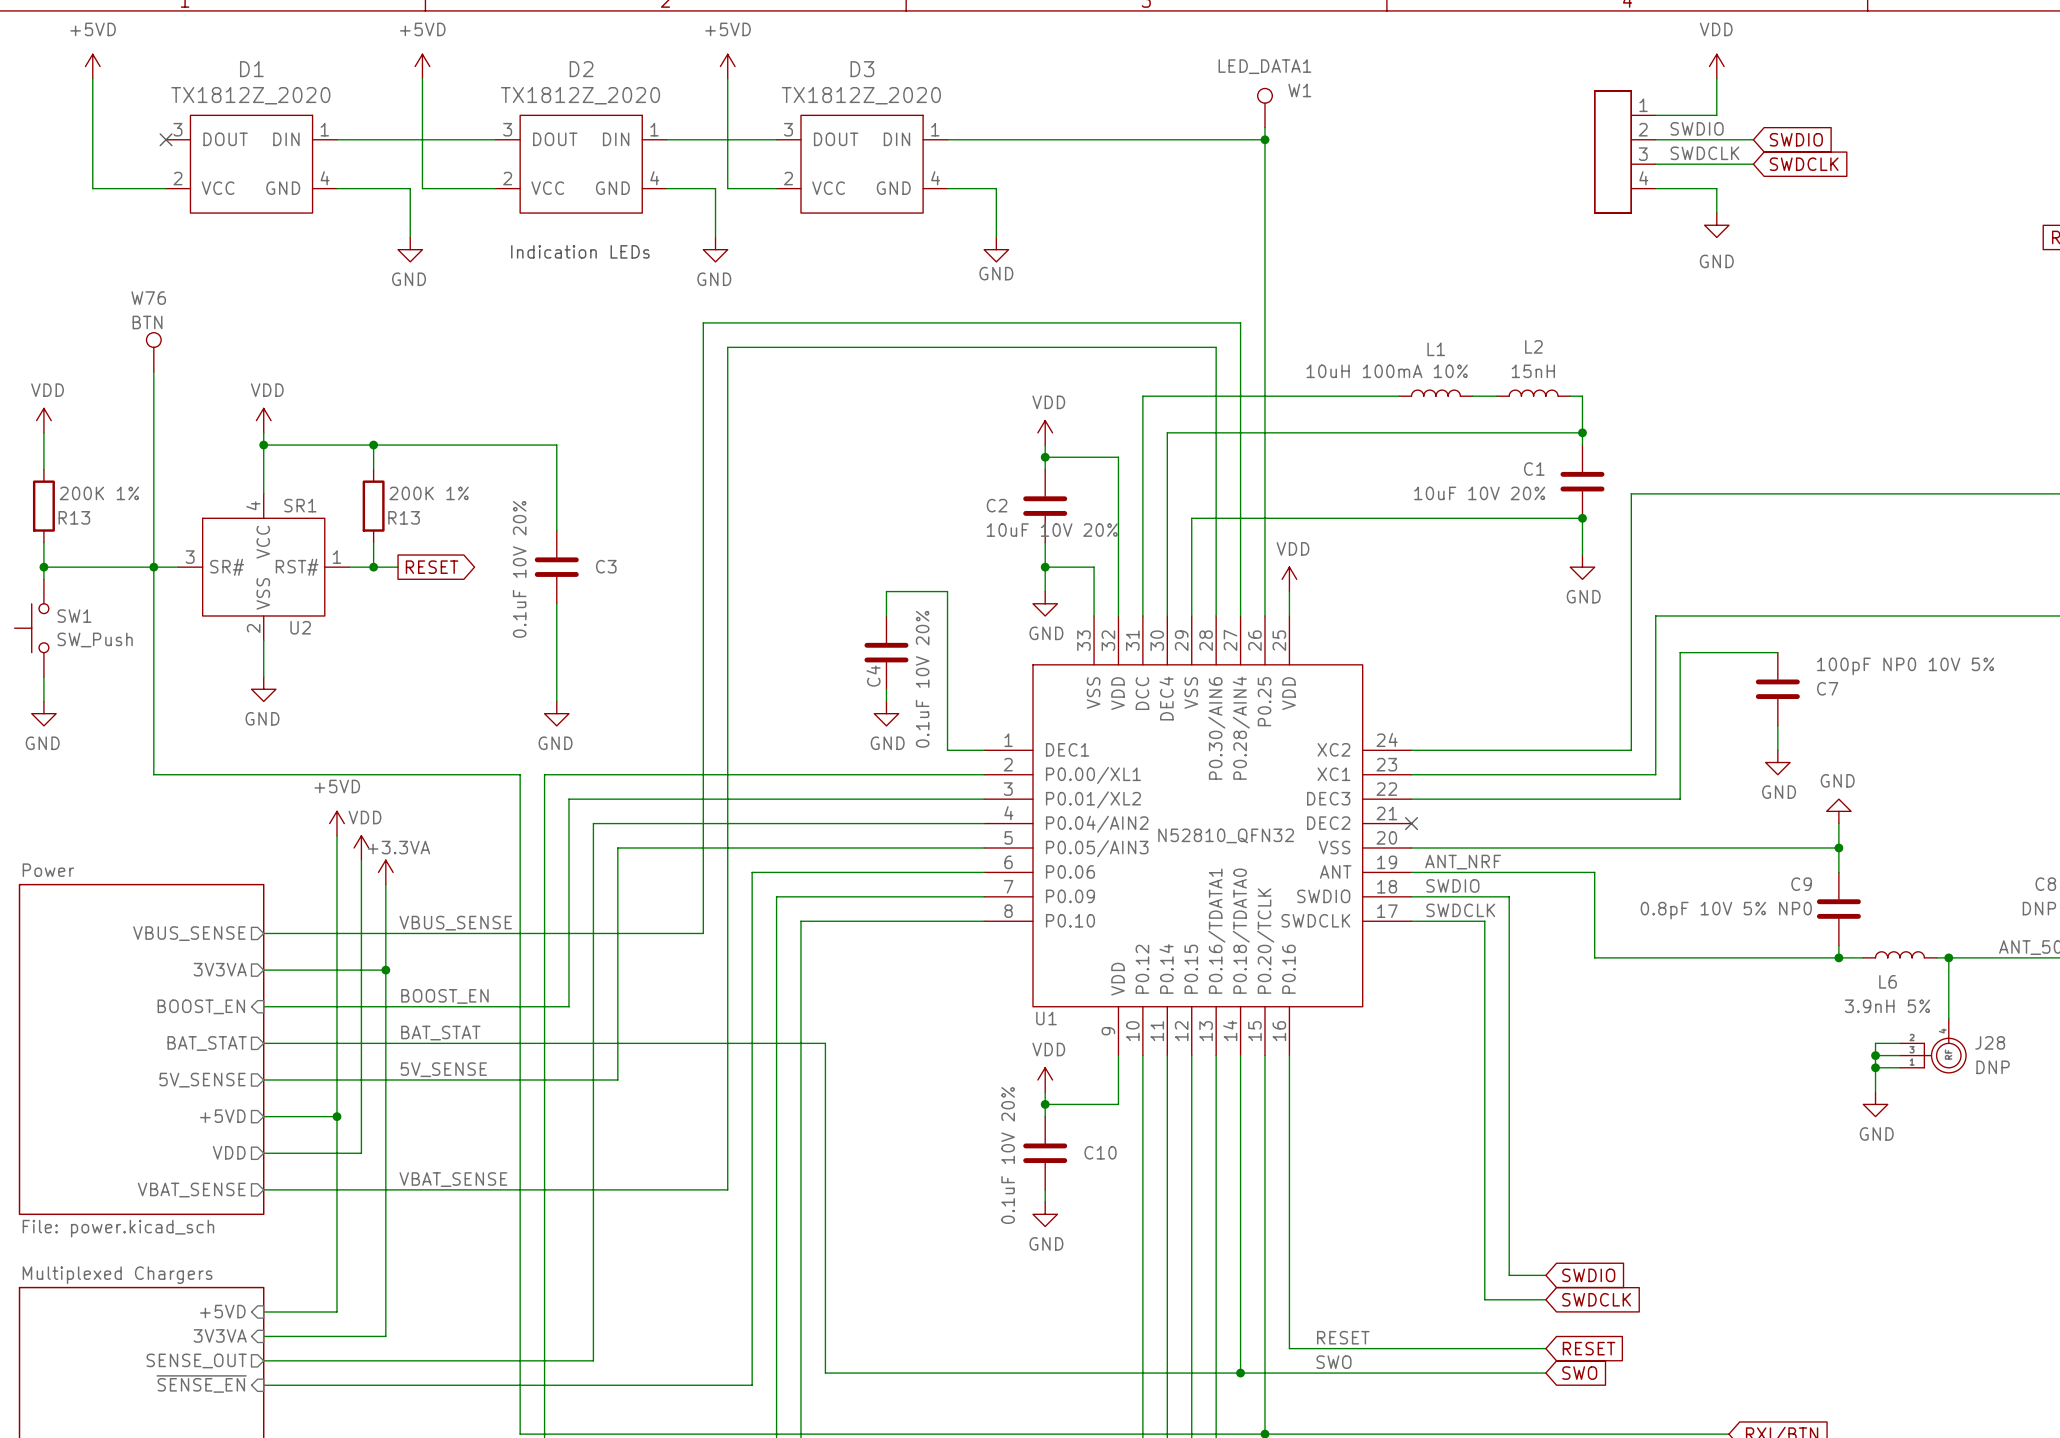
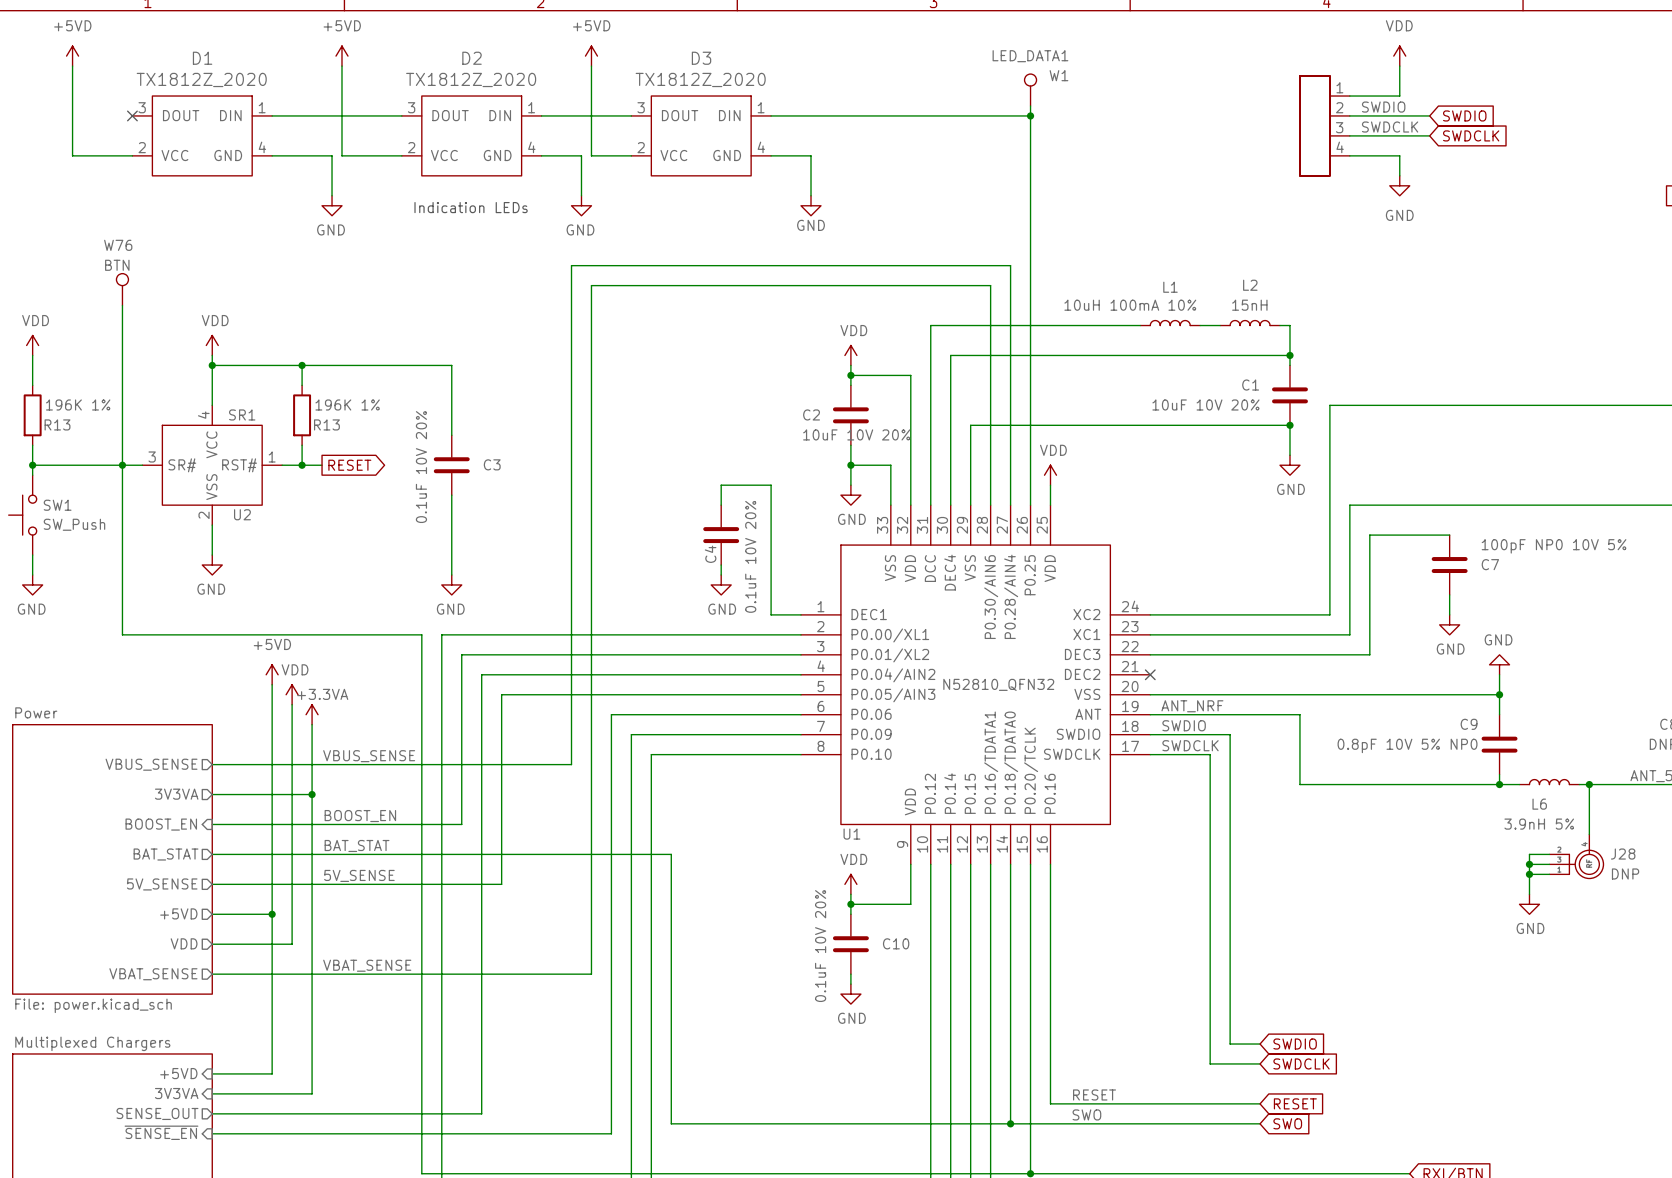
R13 value: 200K 1% (99, 493) -> 196K 1% (78, 404)
R13 value: 200K 1% (429, 493) -> 196K 1% (347, 404)

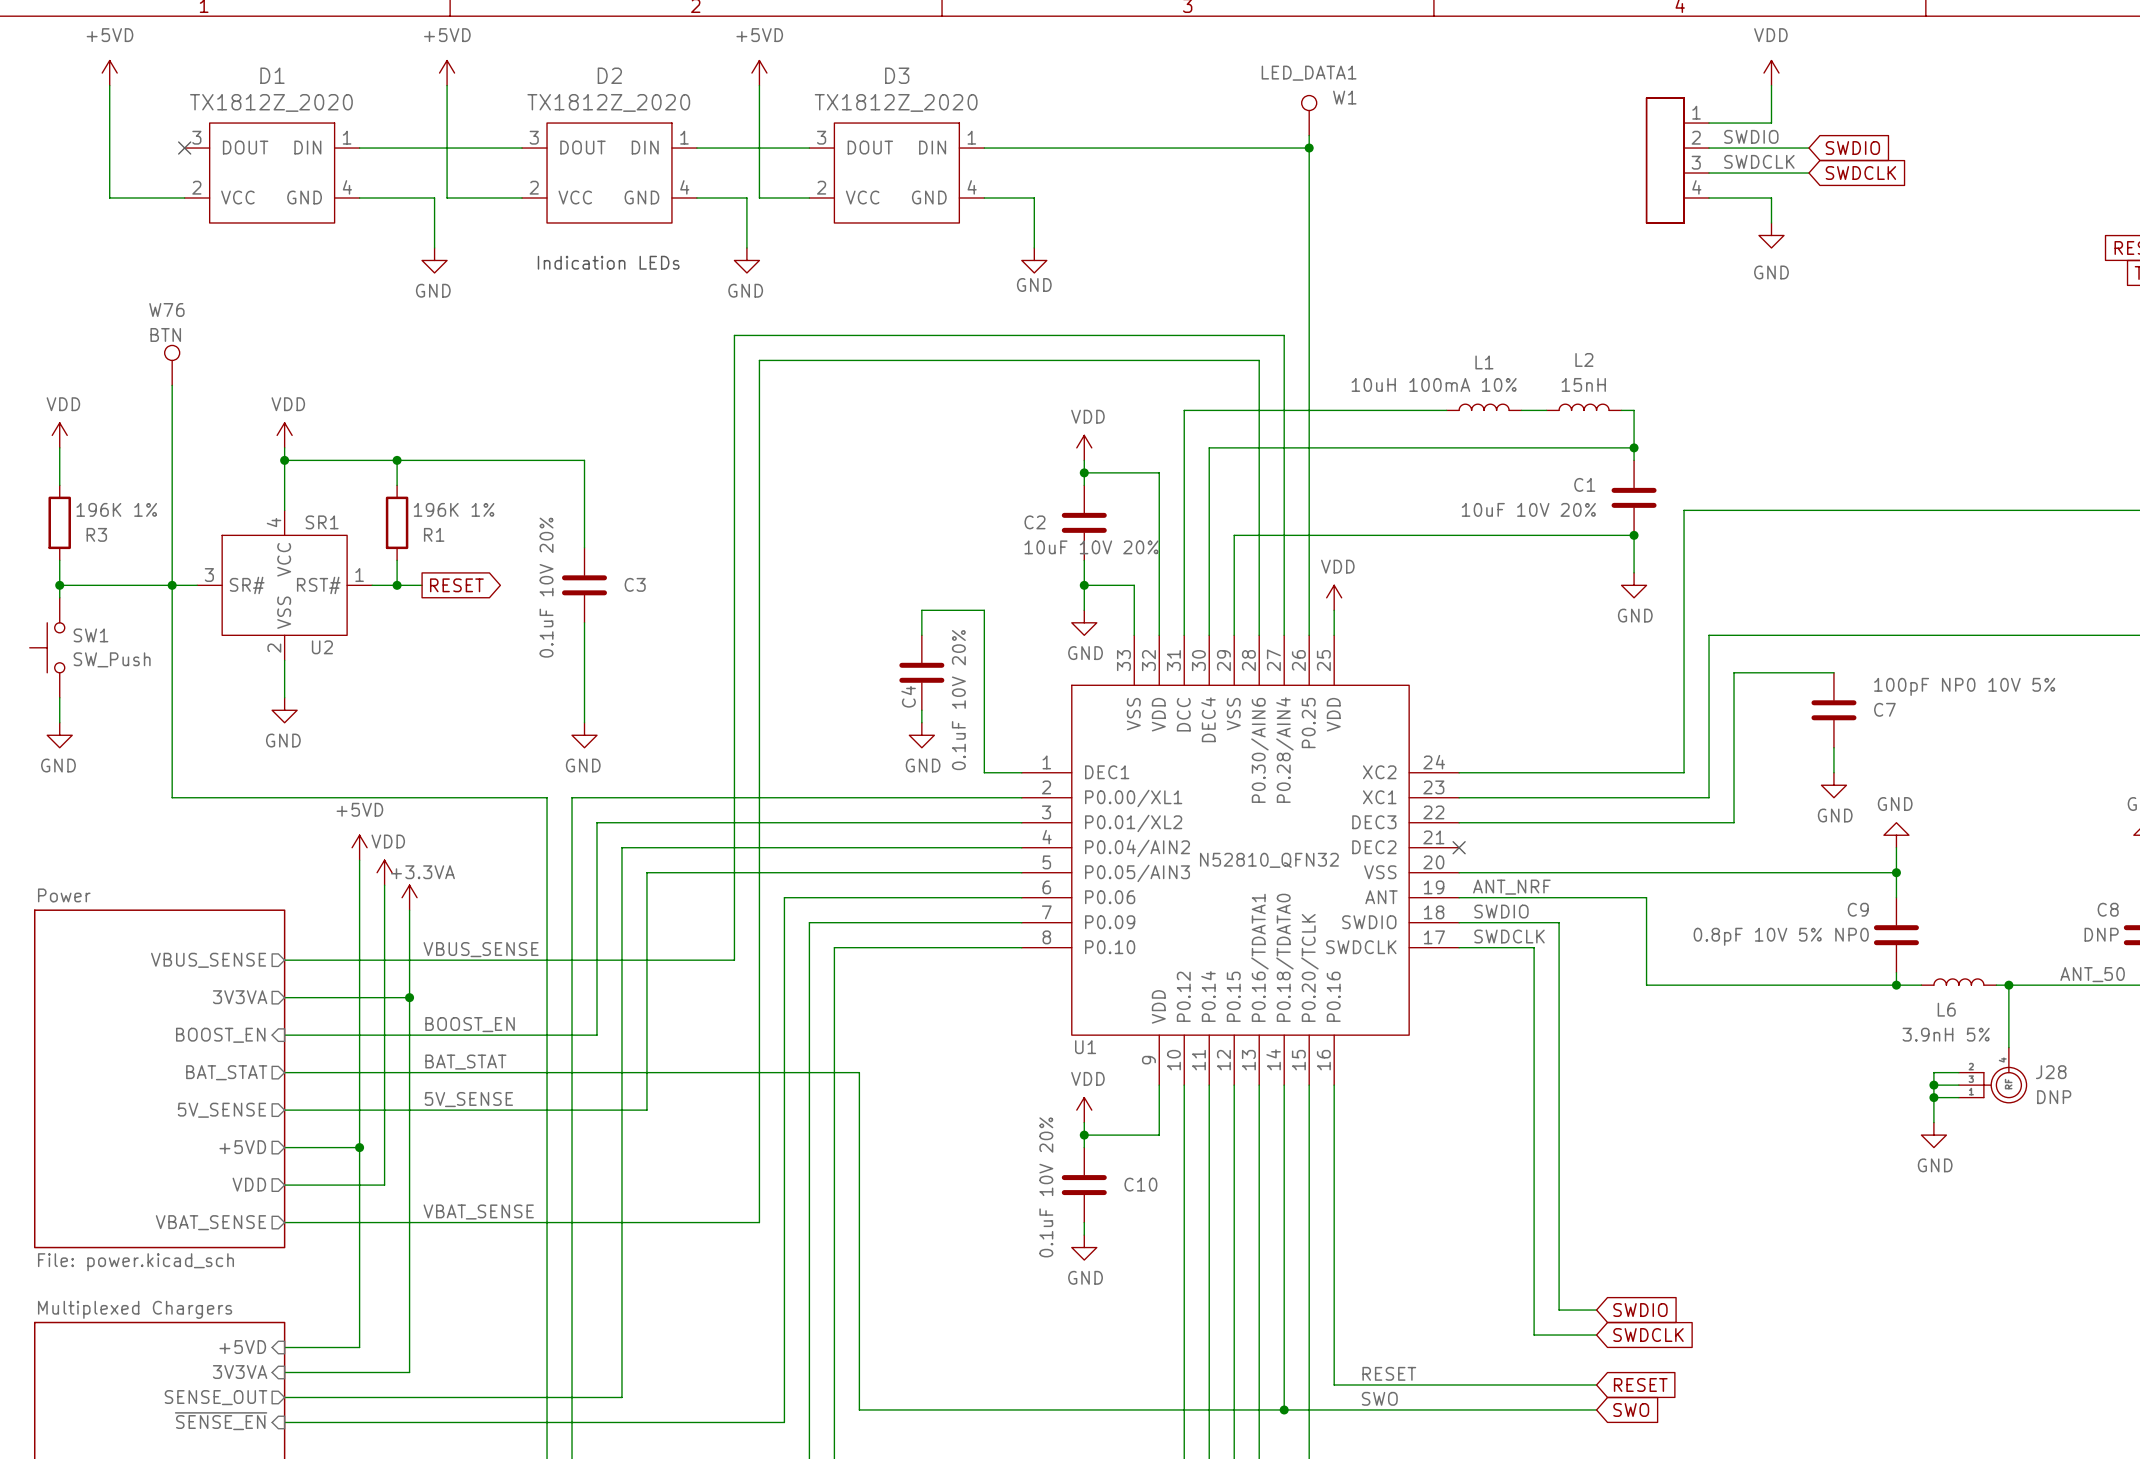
R13 name: R13 (57, 424) -> R3 (96, 534)
R13 name: R13 (326, 424) -> R1 (434, 534)

